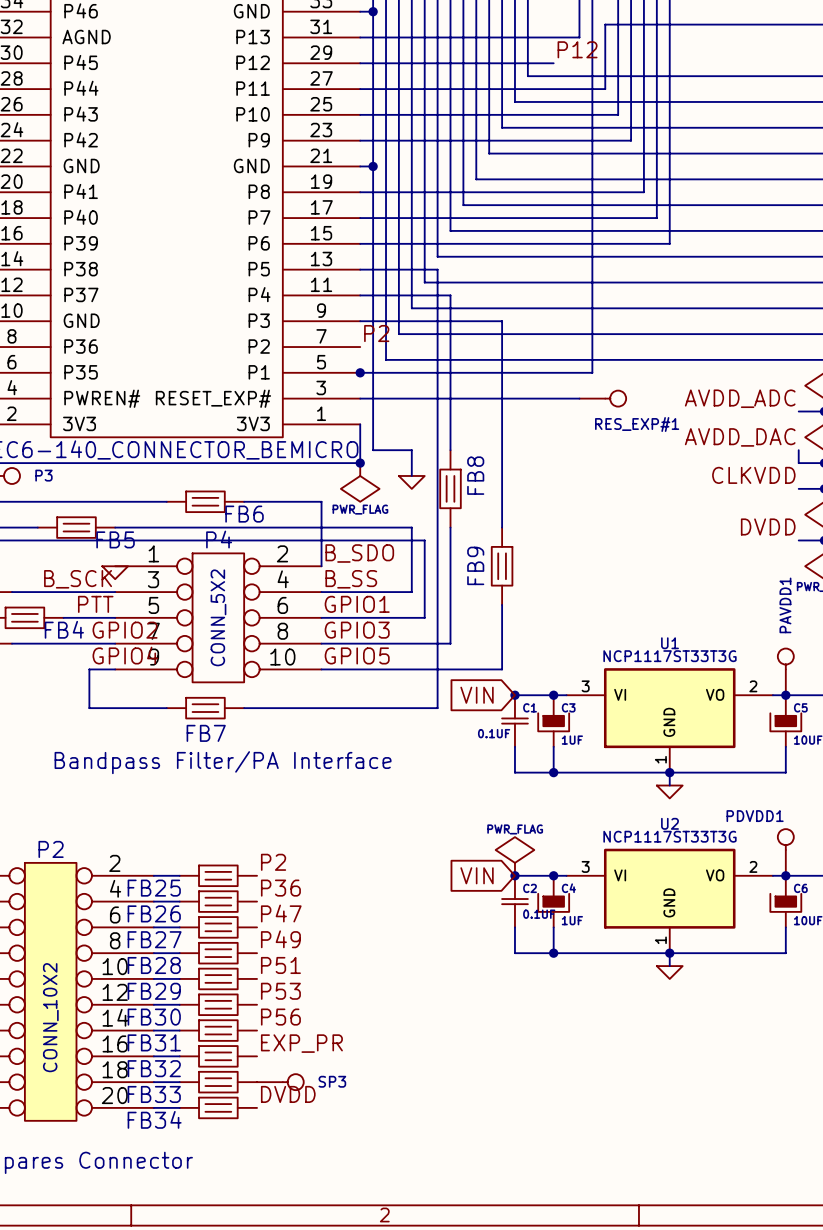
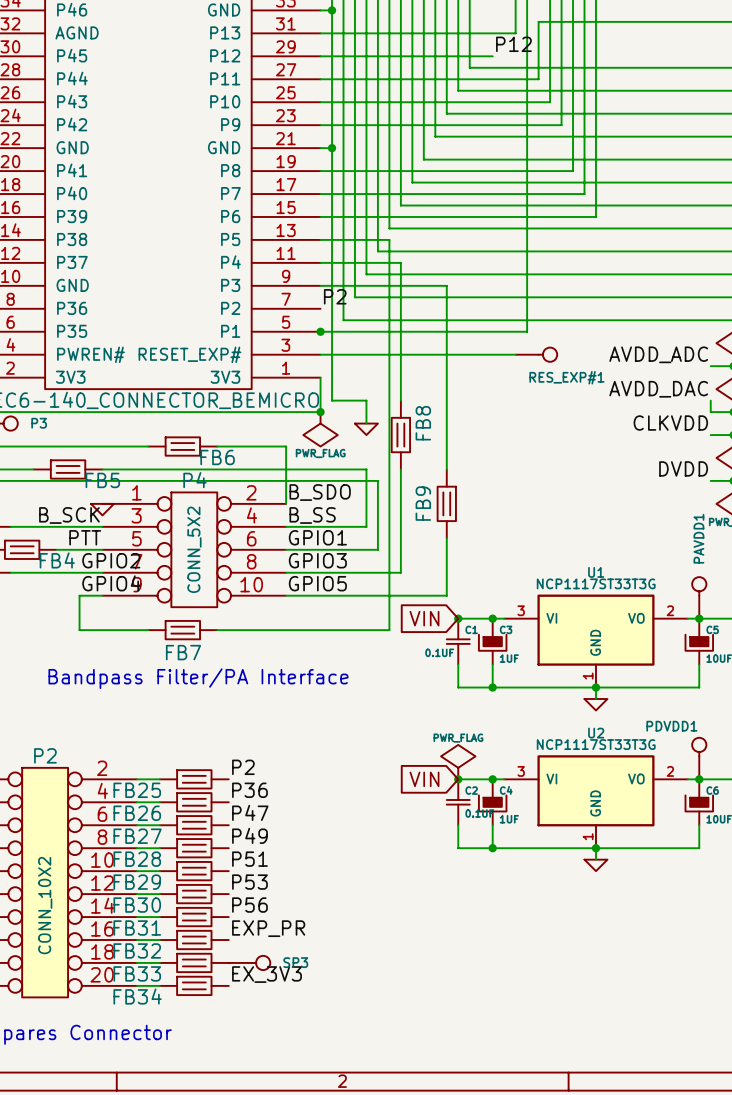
label: DVDD (288, 1094) -> EX_3V3 (267, 974)

